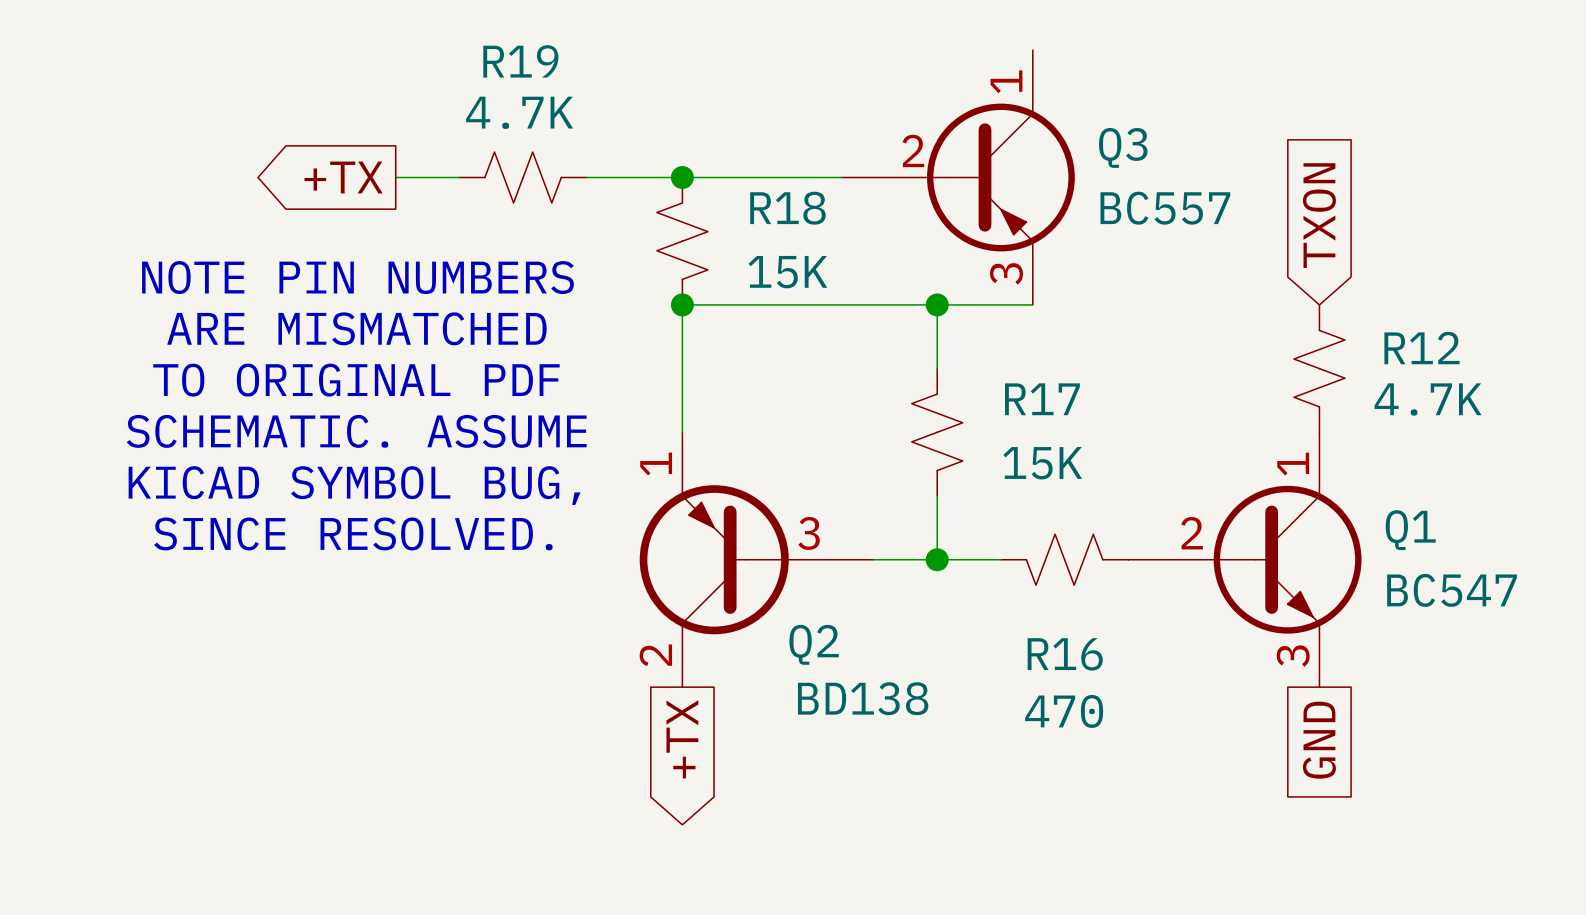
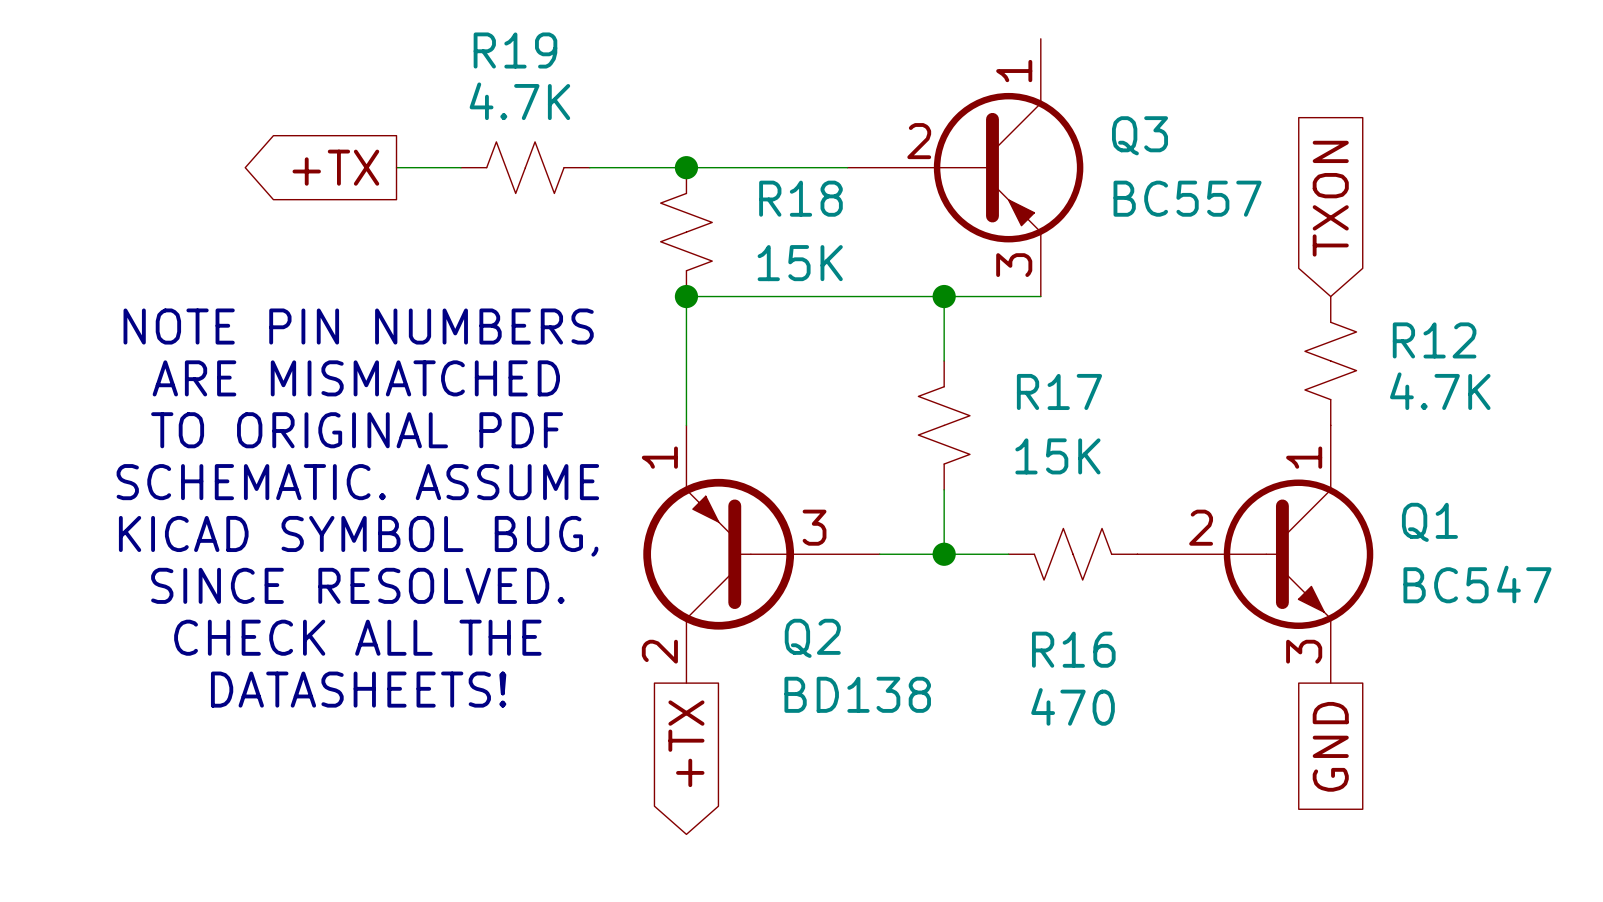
text position: NOTE PIN NUMBERS (358, 277) -> NOTE PIN NUMBERS (358, 326)
text position: ARE MISMATCHED (356, 328) -> ARE MISMATCHED (356, 378)
text position: TO ORIGINAL PDF (356, 380) -> TO ORIGINAL PDF (357, 430)
text position: SCHEMATIC. ASSUME (356, 431) -> SCHEMATIC. ASSUME (357, 482)
text position: KICAD SYMBOL BUG, (354, 485) -> KICAD SYMBOL BUG, (358, 536)
text position: SINCE RESOLVED. (353, 533) -> SINCE RESOLVED. (357, 585)
text: none -> CHECK ALL THE (357, 637)
text: none -> DATASHEETS! (358, 689)

